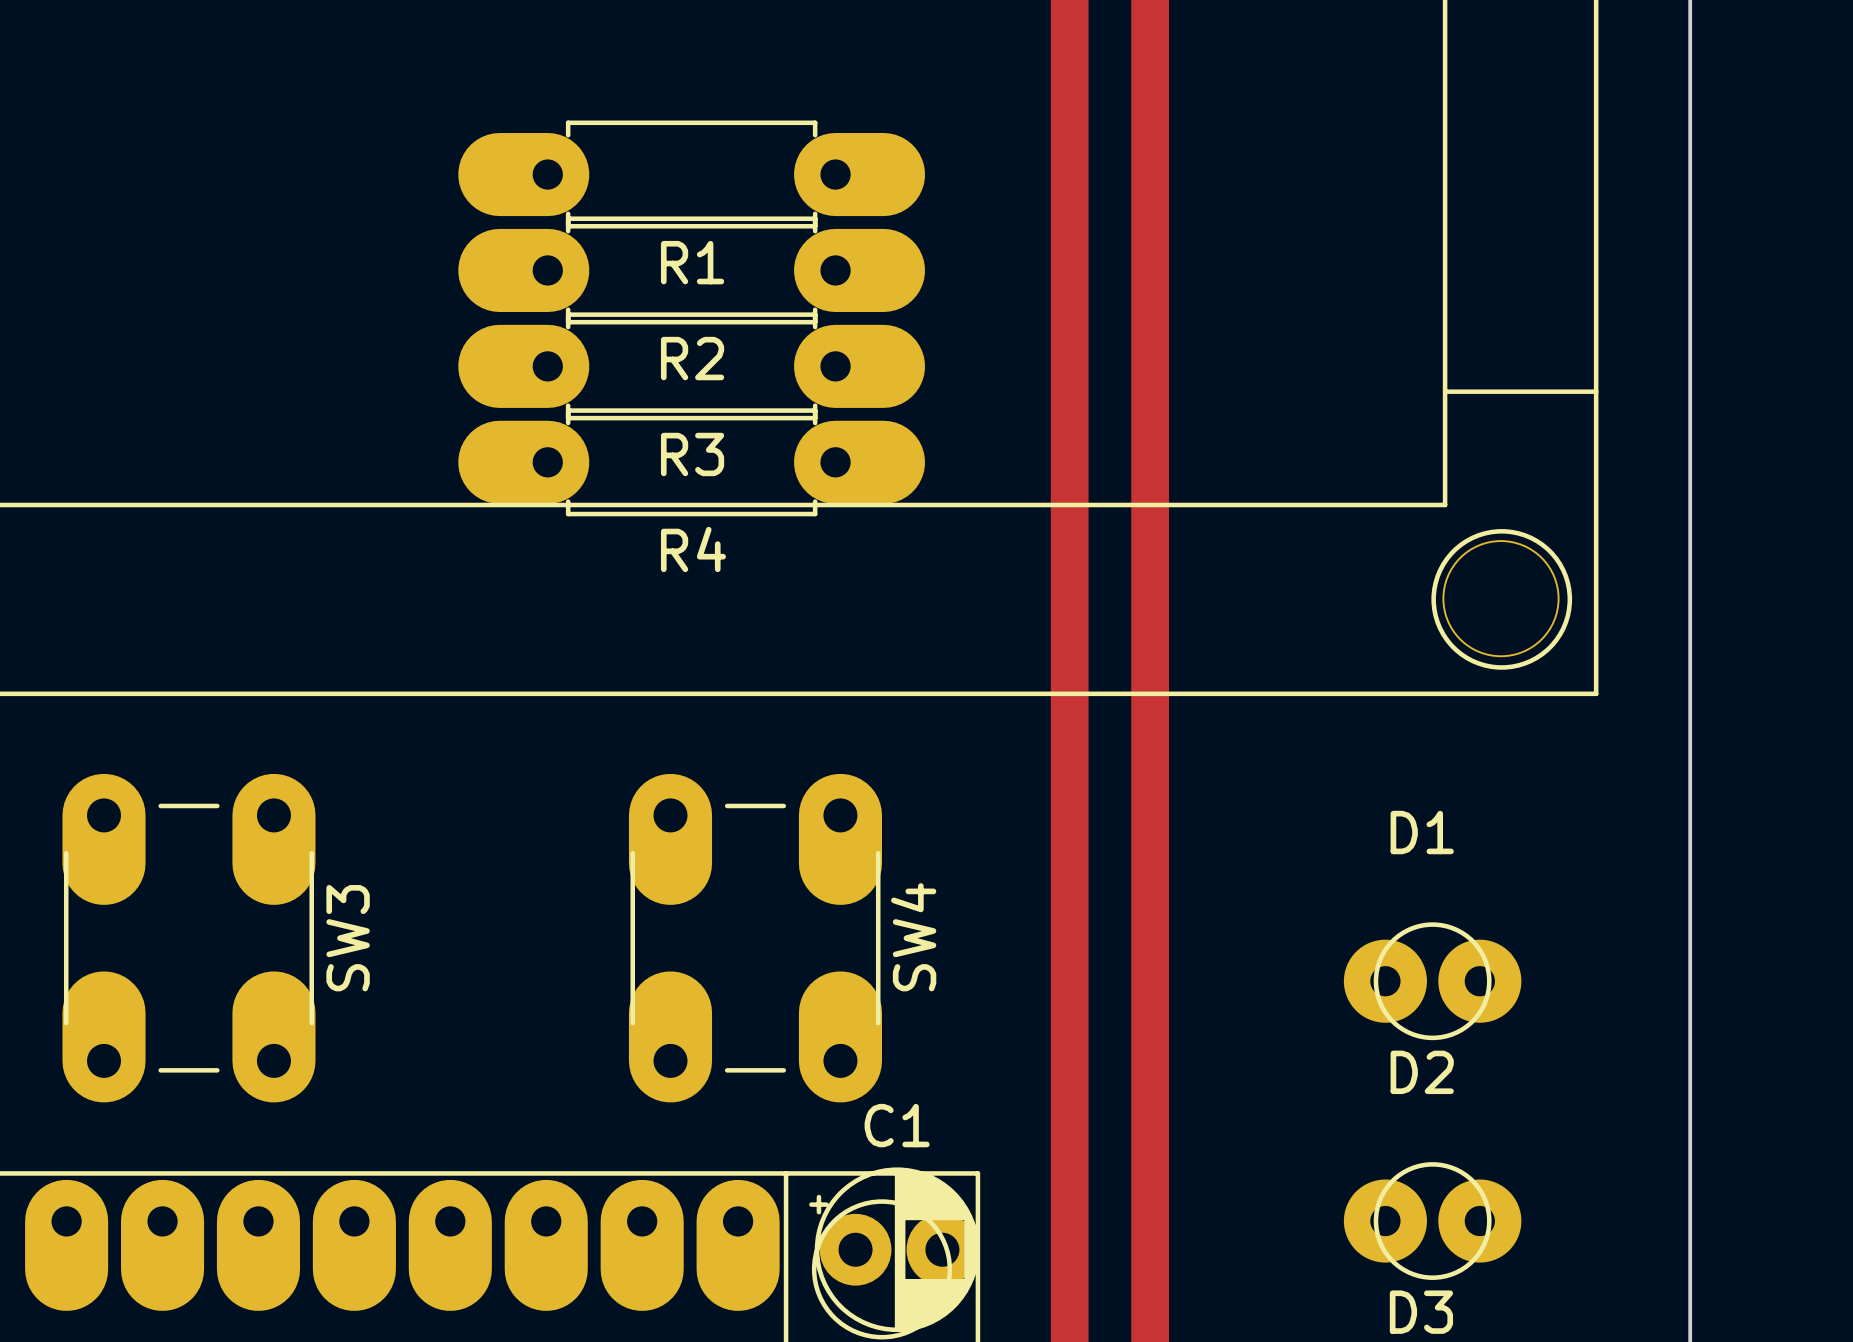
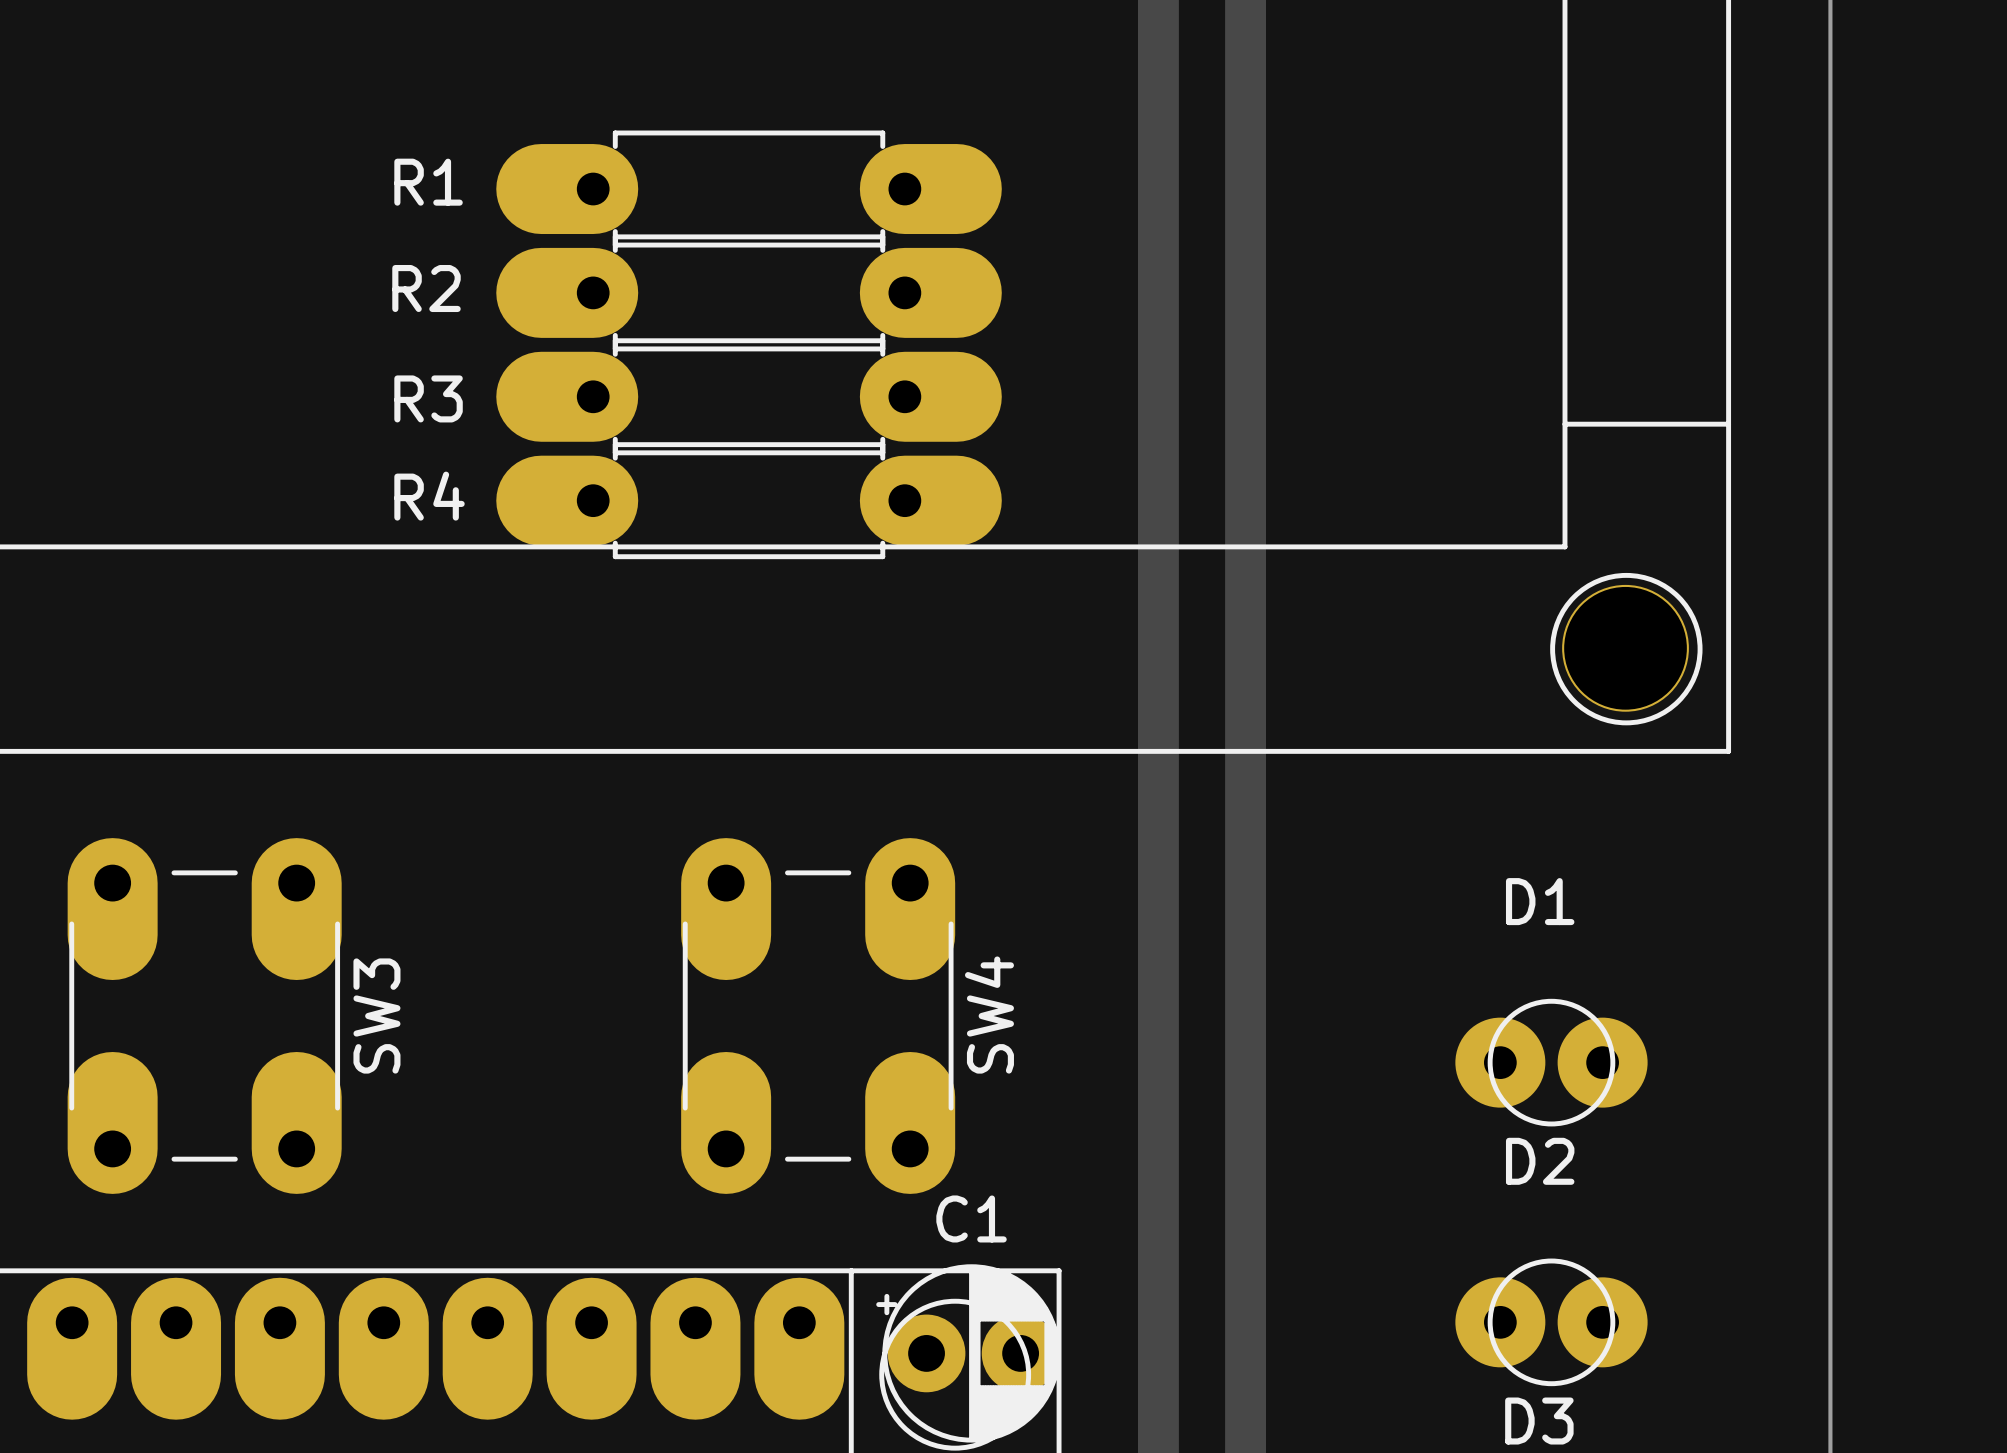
R1 name position: R1 (692, 262) -> R1 (428, 182)
R2 name position: R2 (692, 358) -> R2 (426, 288)
R3 name position: R3 (692, 454) -> R3 (428, 398)
R4 name position: R4 (693, 549) -> R4 (429, 496)

